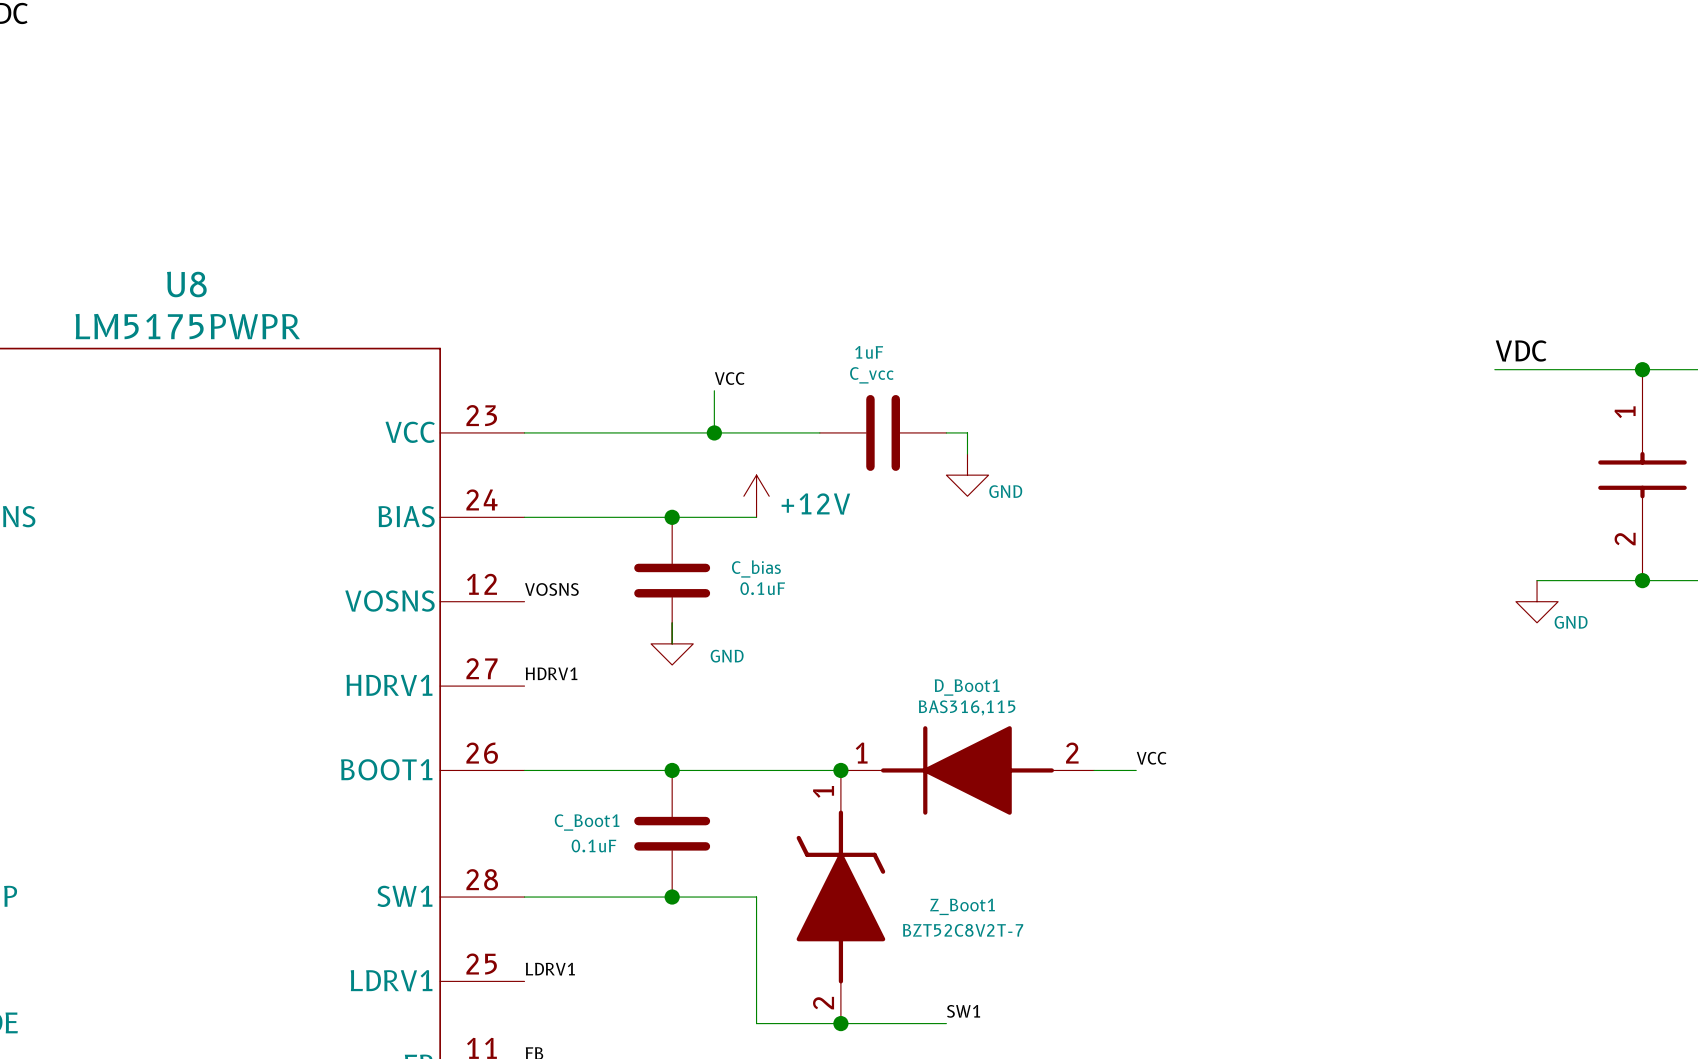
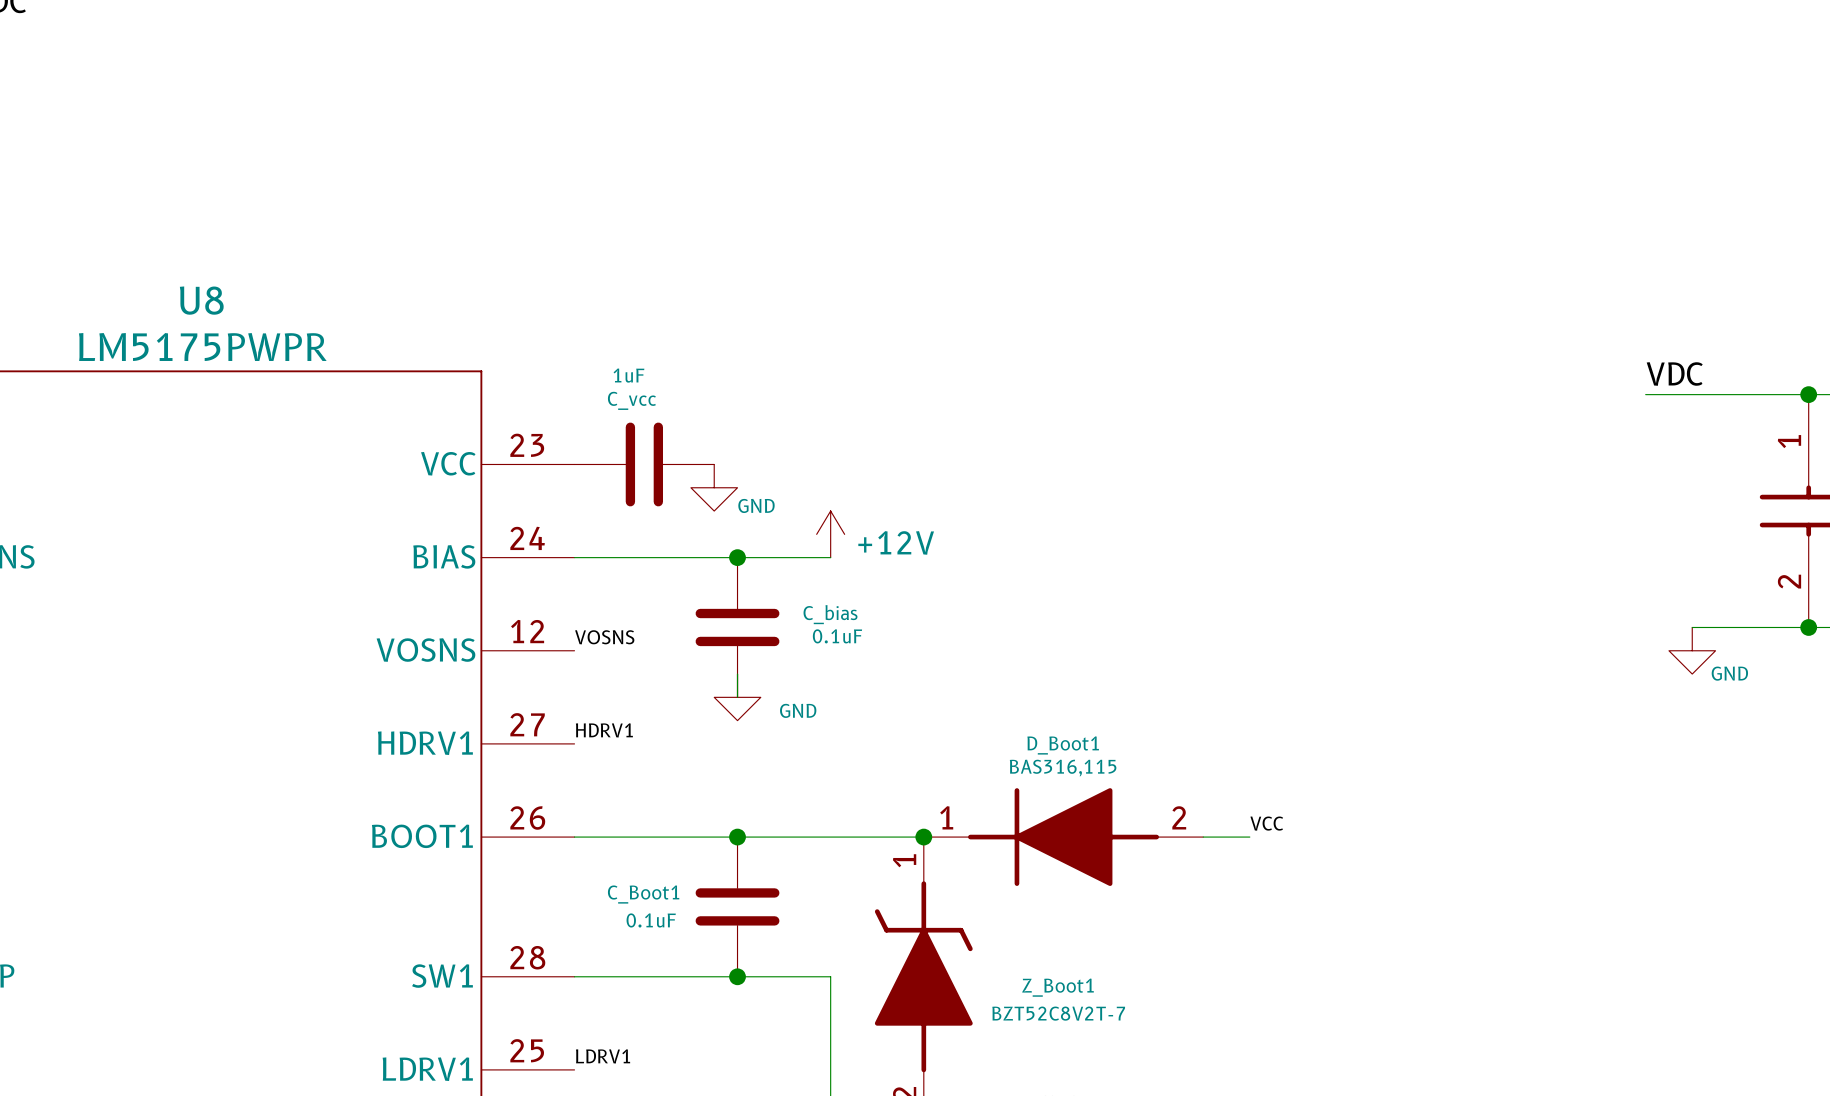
label: VCC (729, 378) -> none
wire: (714, 390) (714, 432) -> none
wire: (524, 432) (819, 432) -> none
junction: (714, 432) -> none
C_vcc position: (883, 432) -> (644, 464)
wire: (946, 432) (967, 432) (967, 454) -> none
power symbol position: GND (967, 475) -> GND (714, 487)

